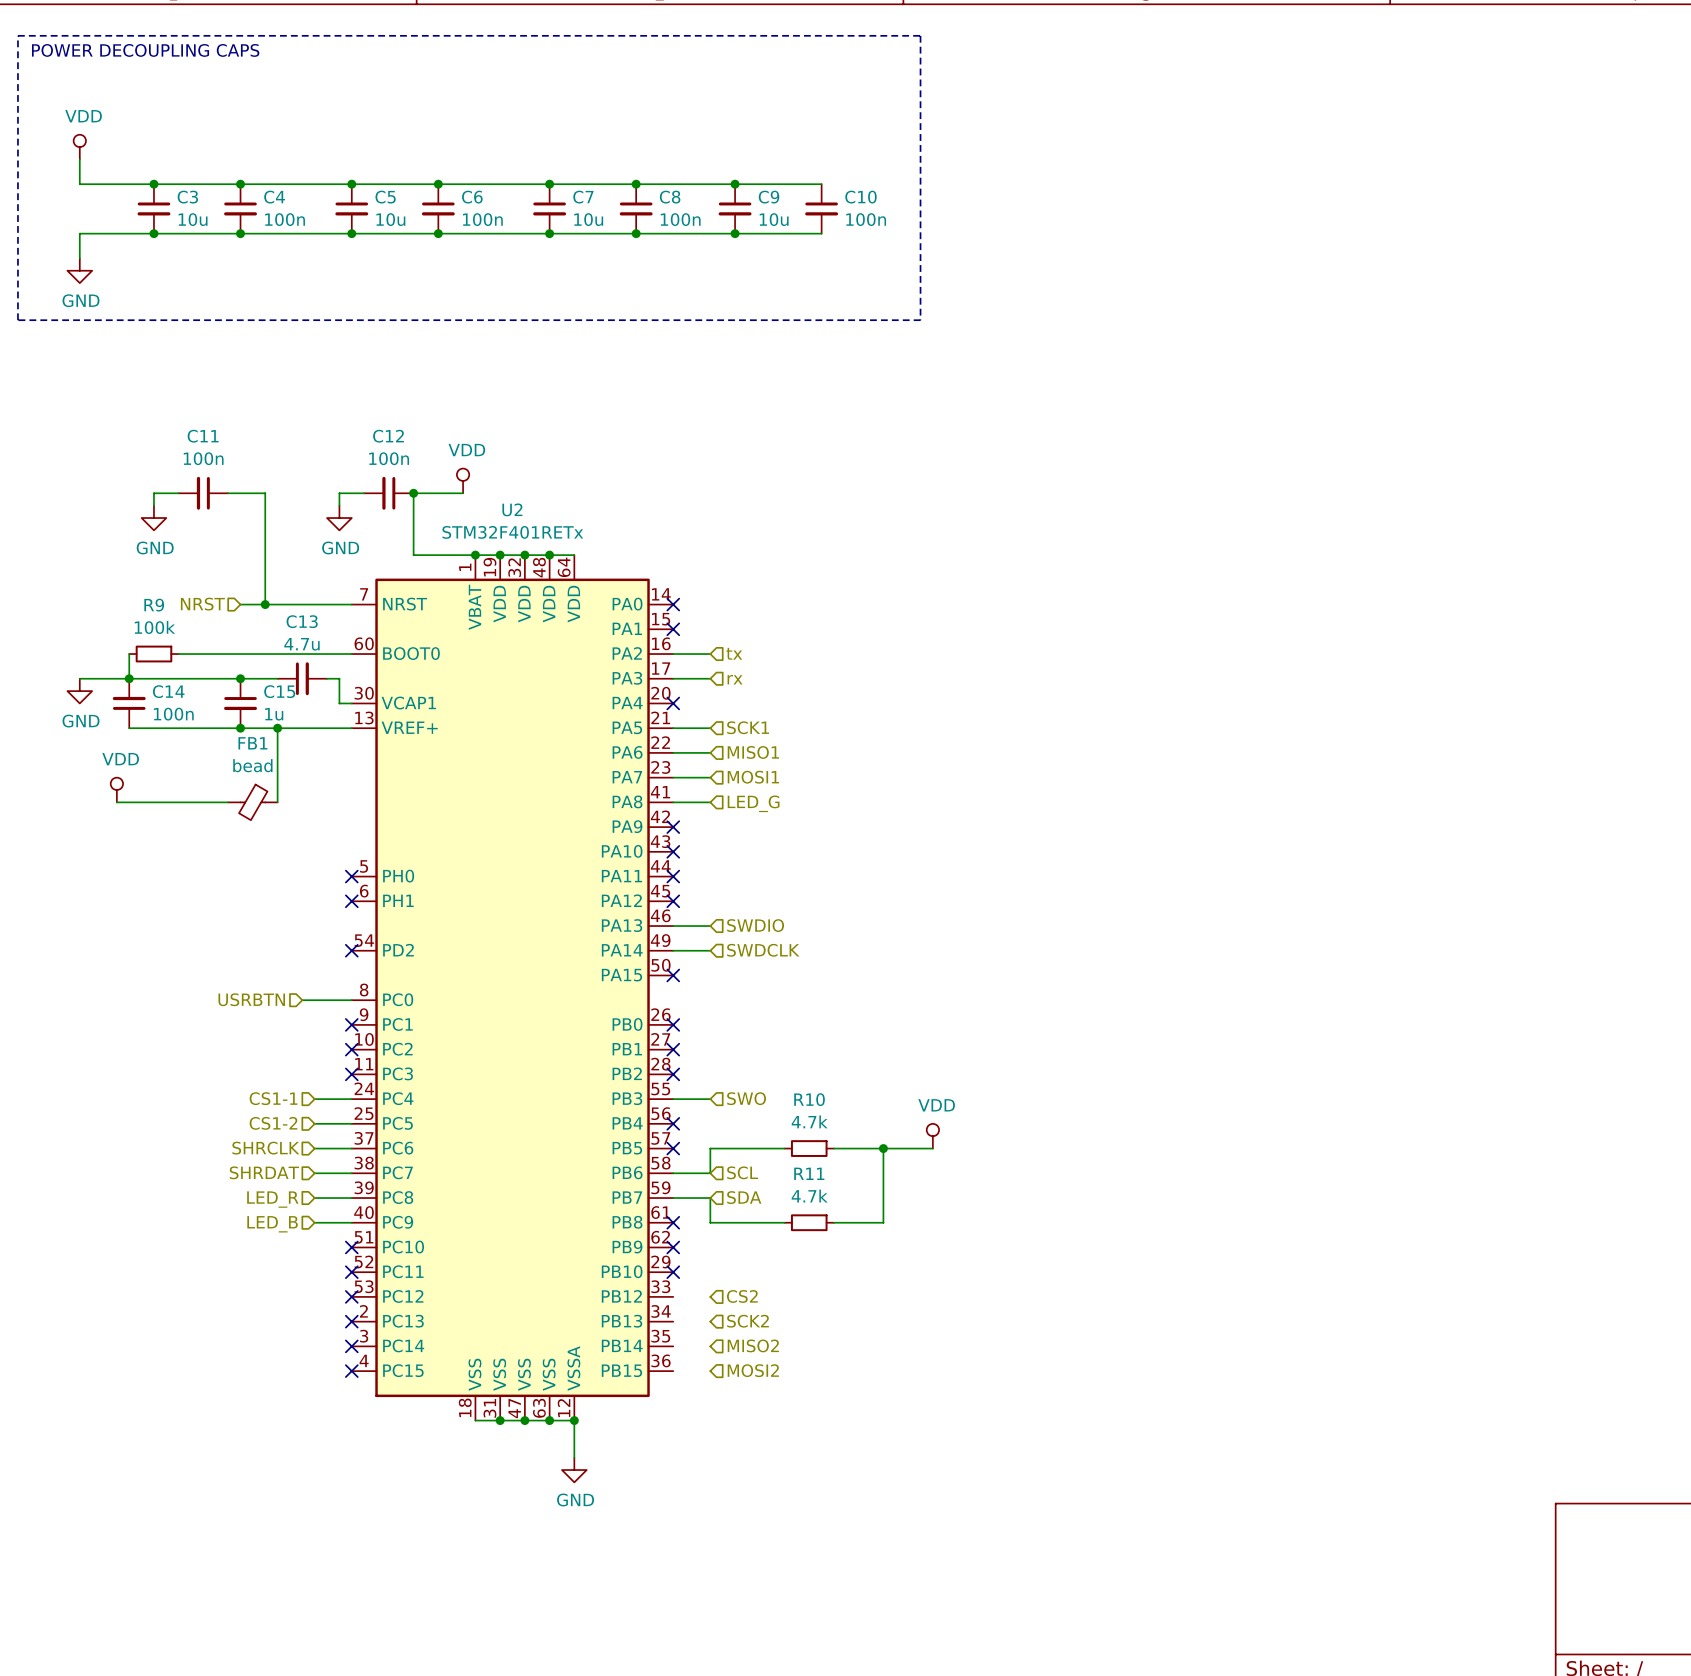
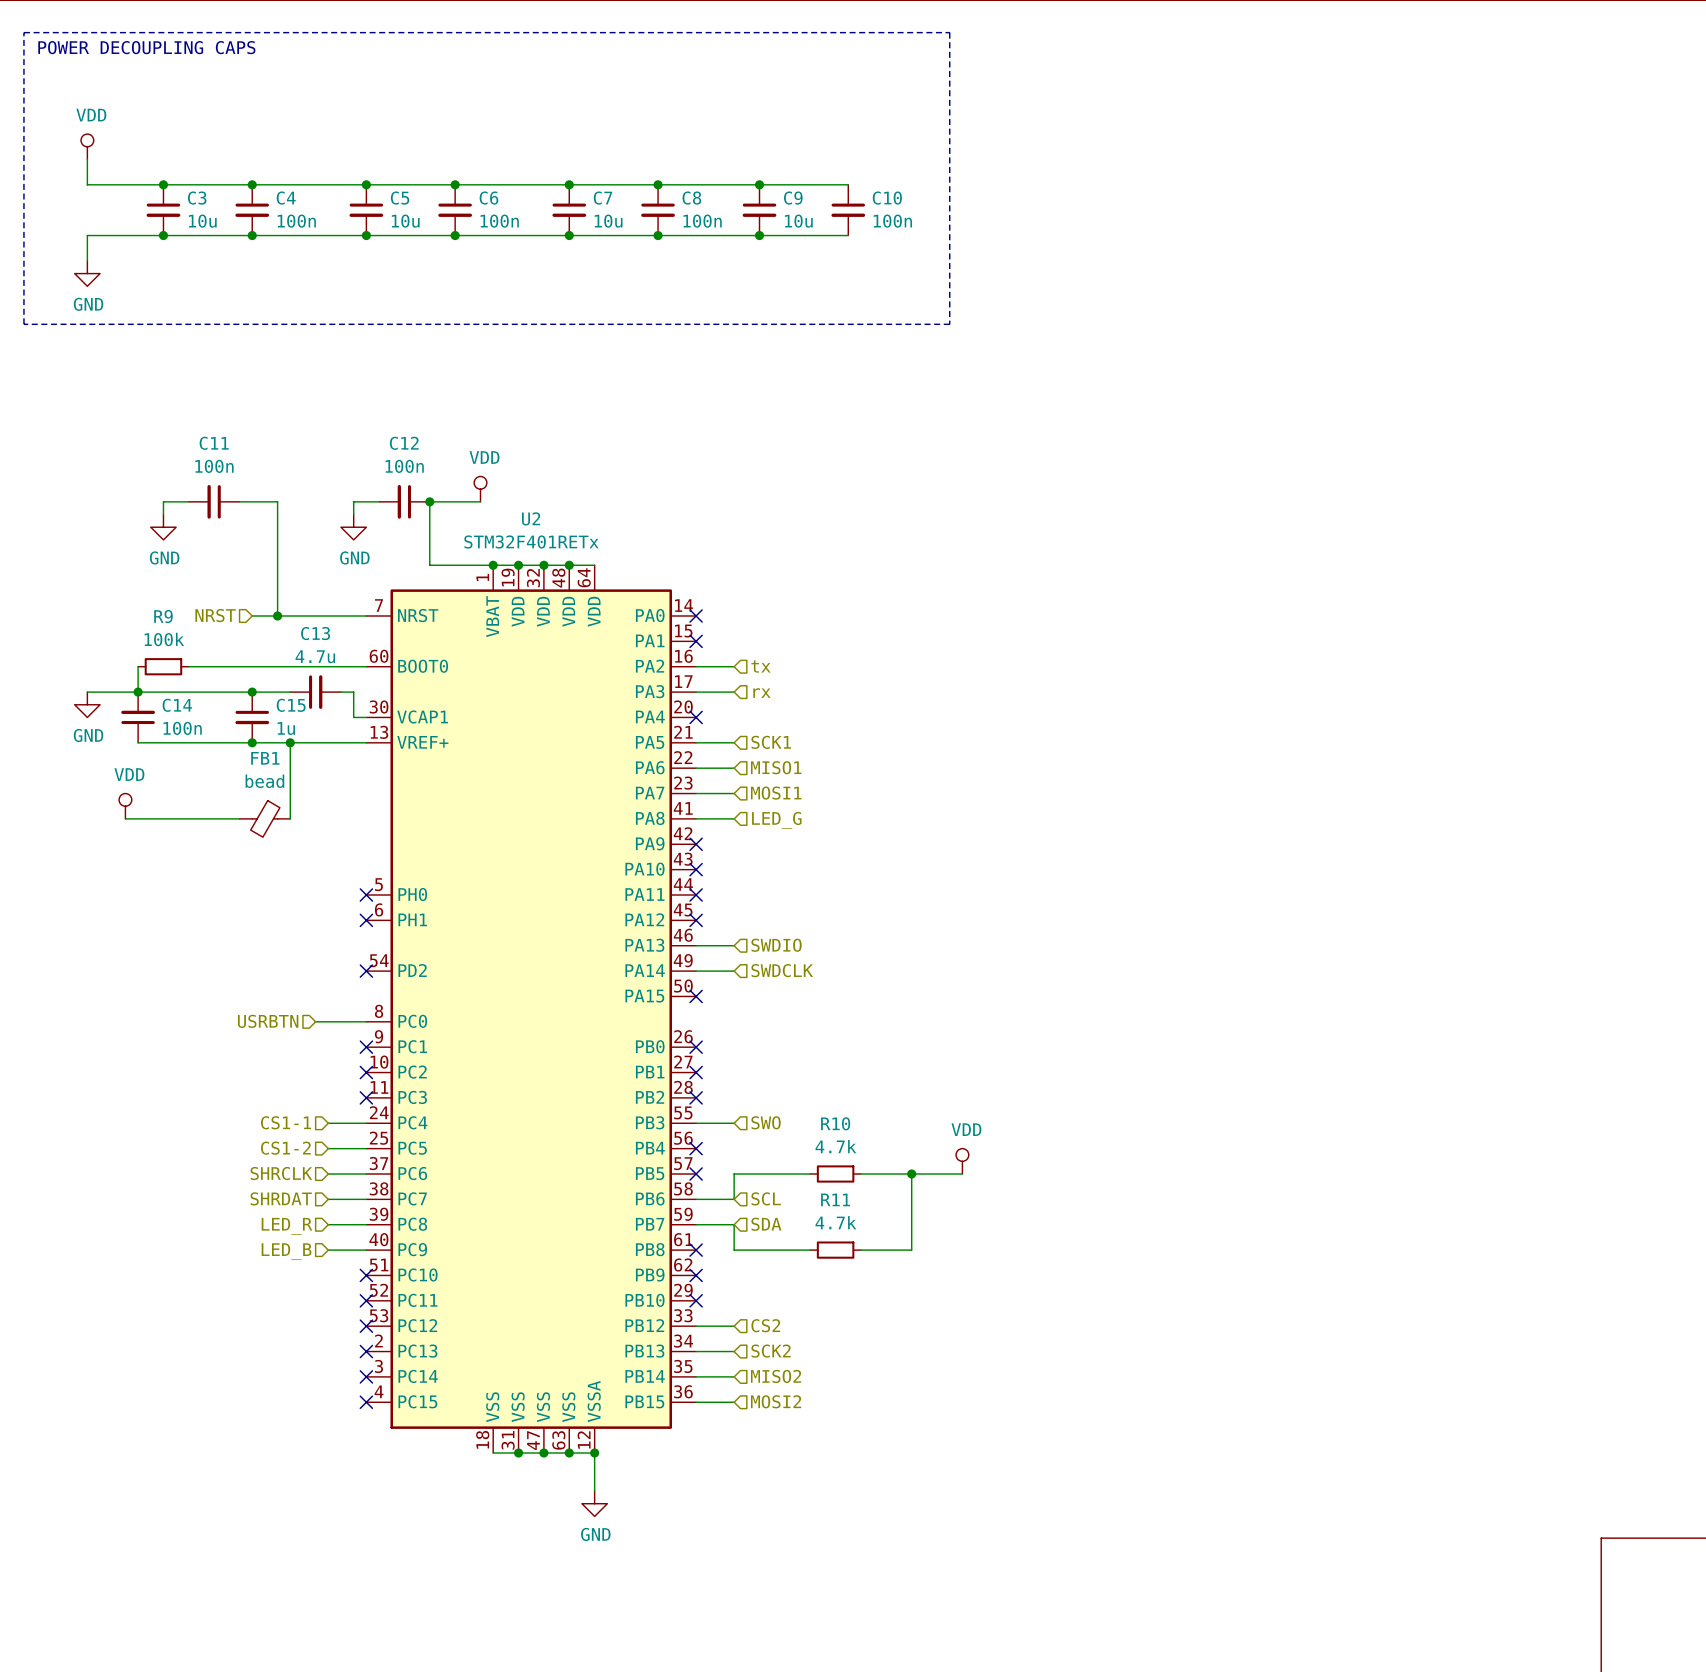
wire: none -> (696, 1326) (734, 1326)
wire: none -> (696, 1351) (734, 1351)
wire: none -> (696, 1376) (734, 1376)
wire: none -> (696, 1402) (734, 1402)

